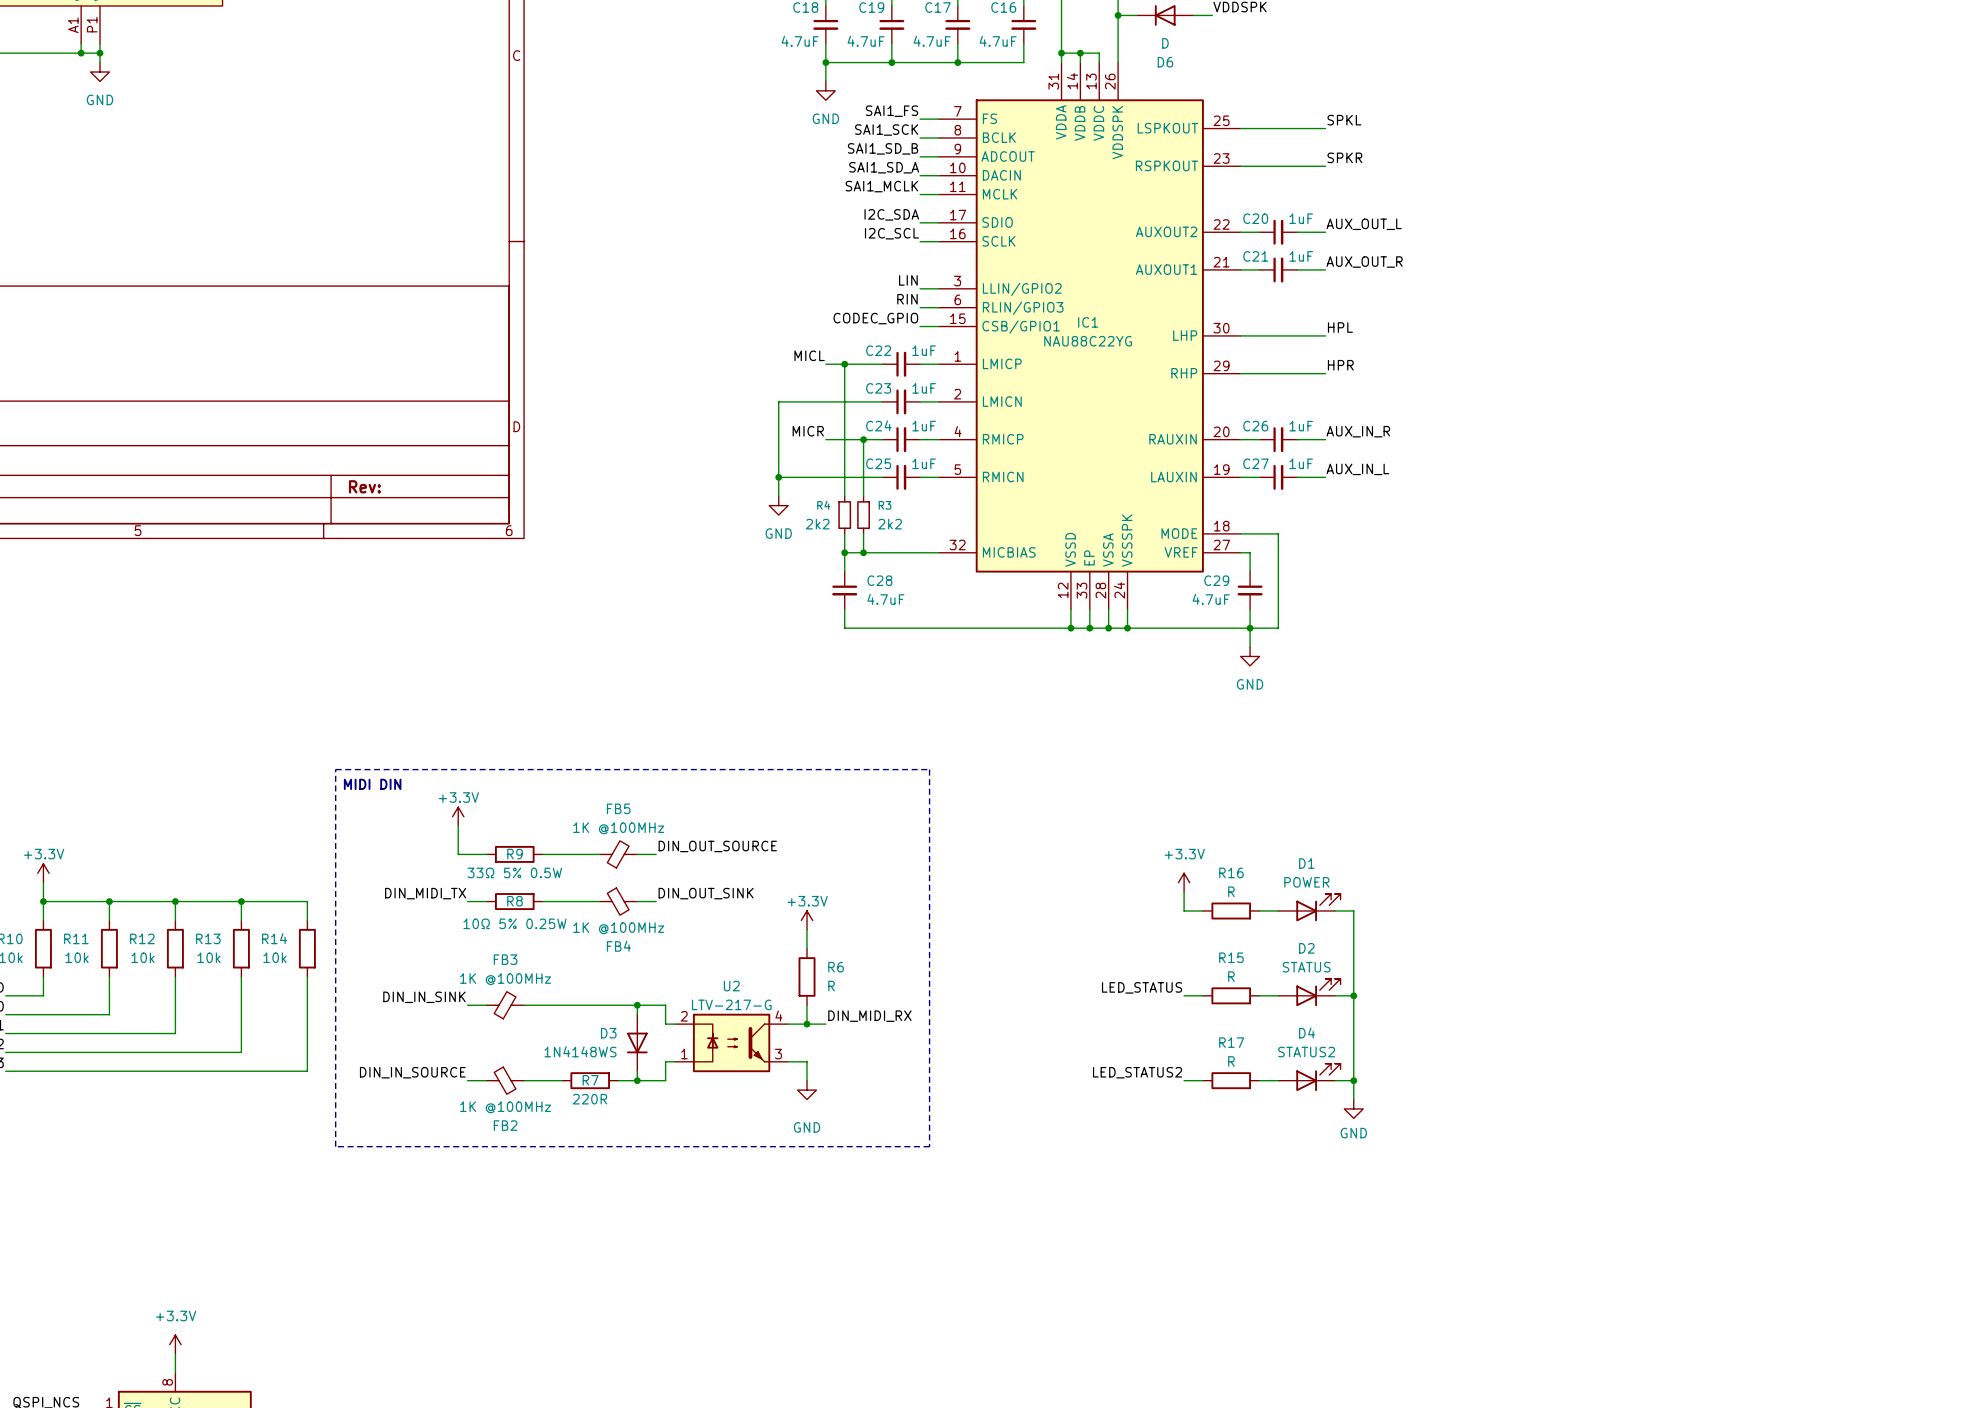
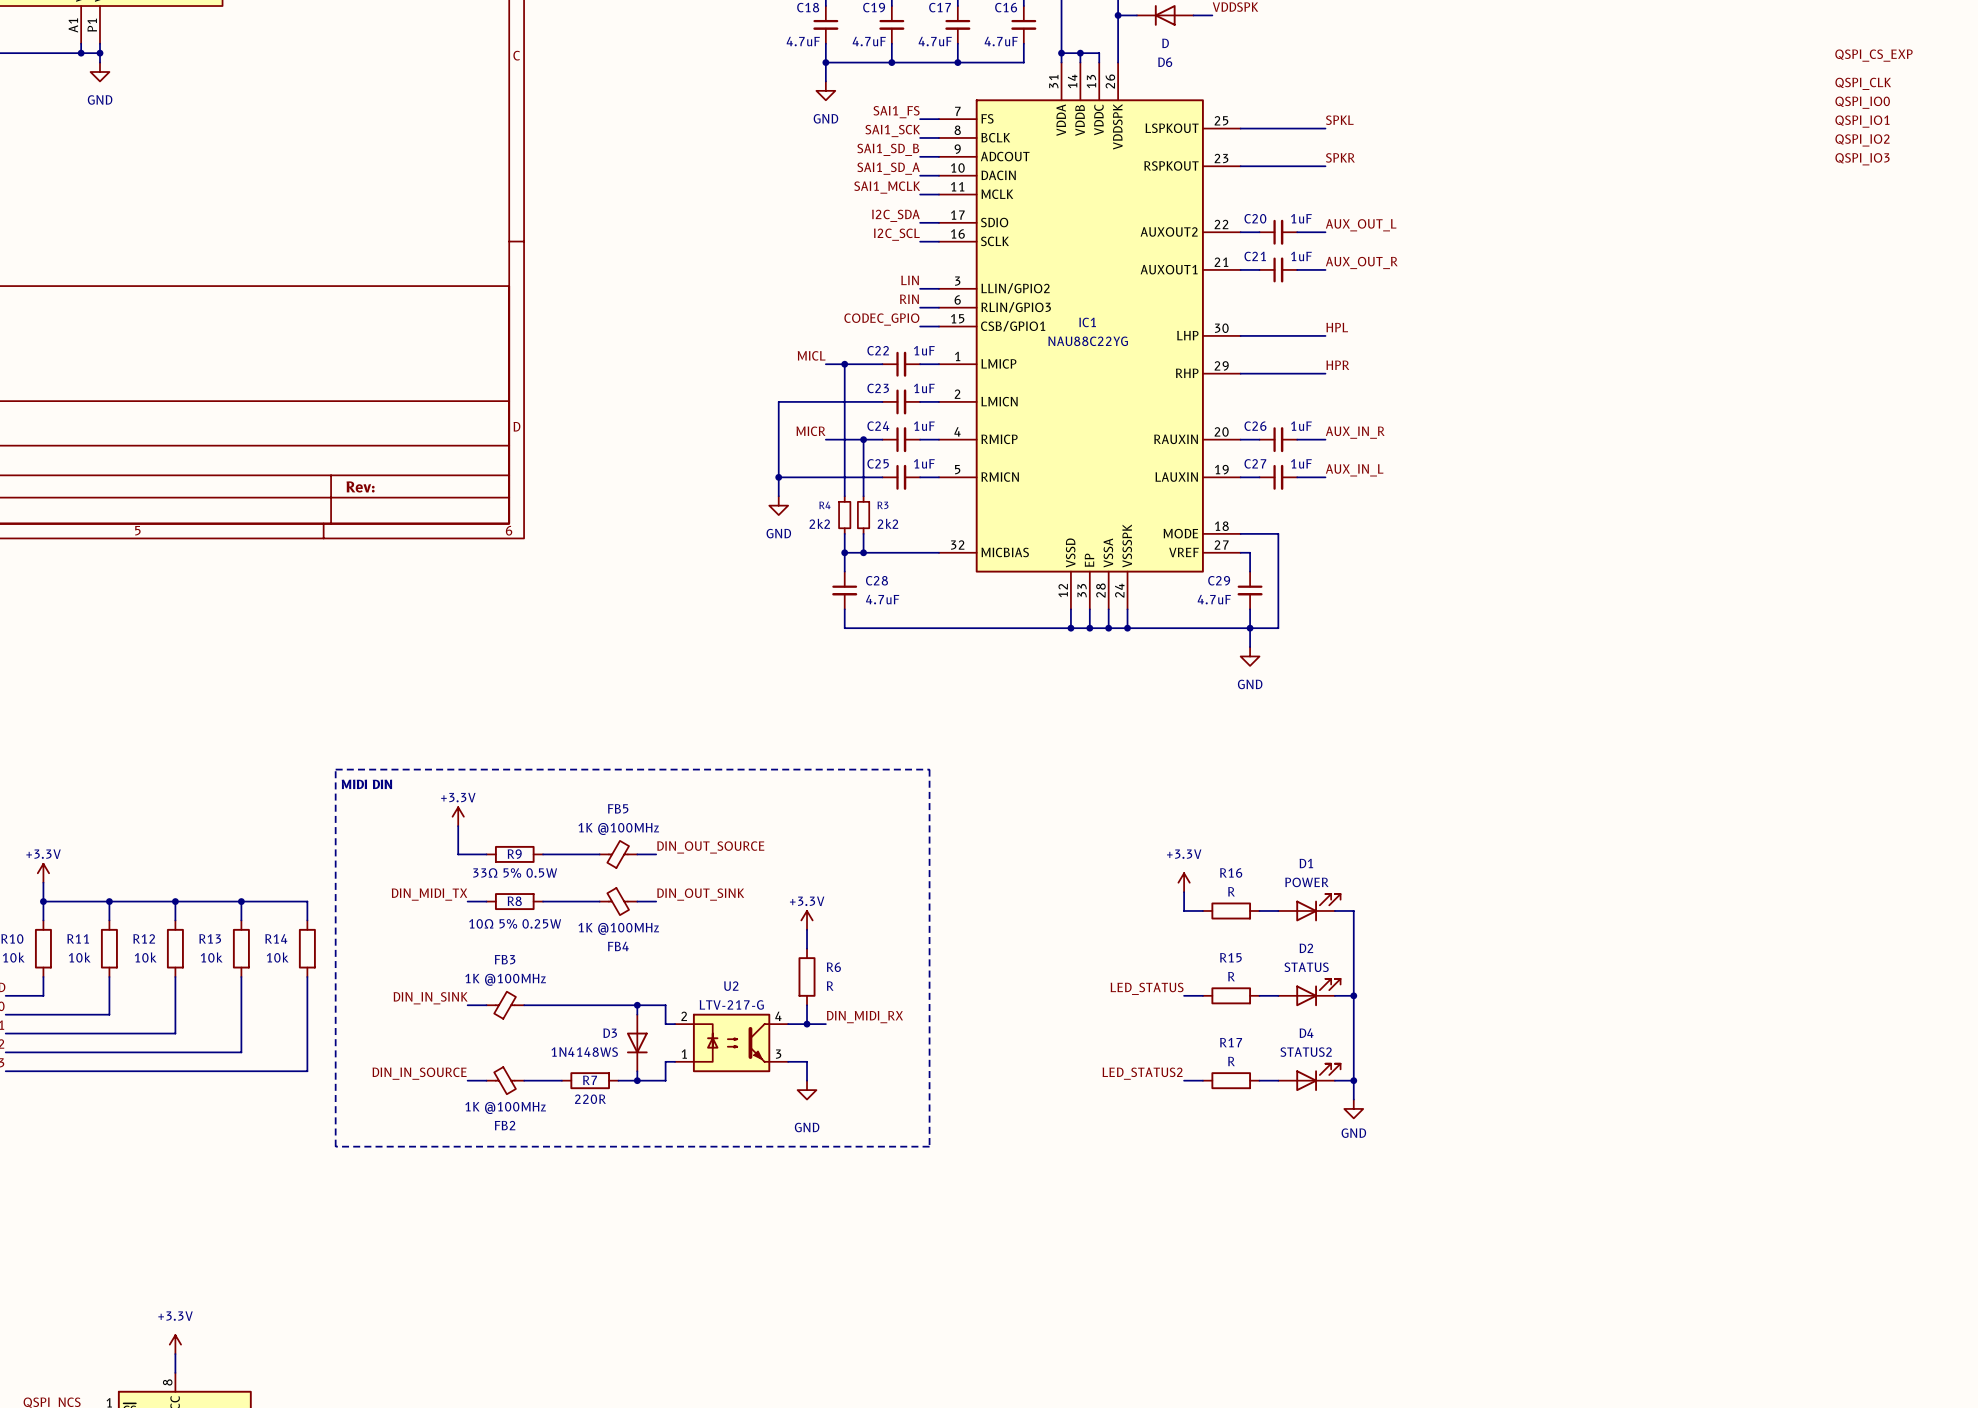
label: none -> QSPI_CS_EXP (1873, 55)
label: none -> QSPI_CLK (1863, 83)
label: none -> QSPI_IO0 (1862, 102)
label: none -> QSPI_IO1 (1862, 121)
label: none -> QSPI_IO2 (1862, 140)
label: none -> QSPI_IO3 (1862, 159)

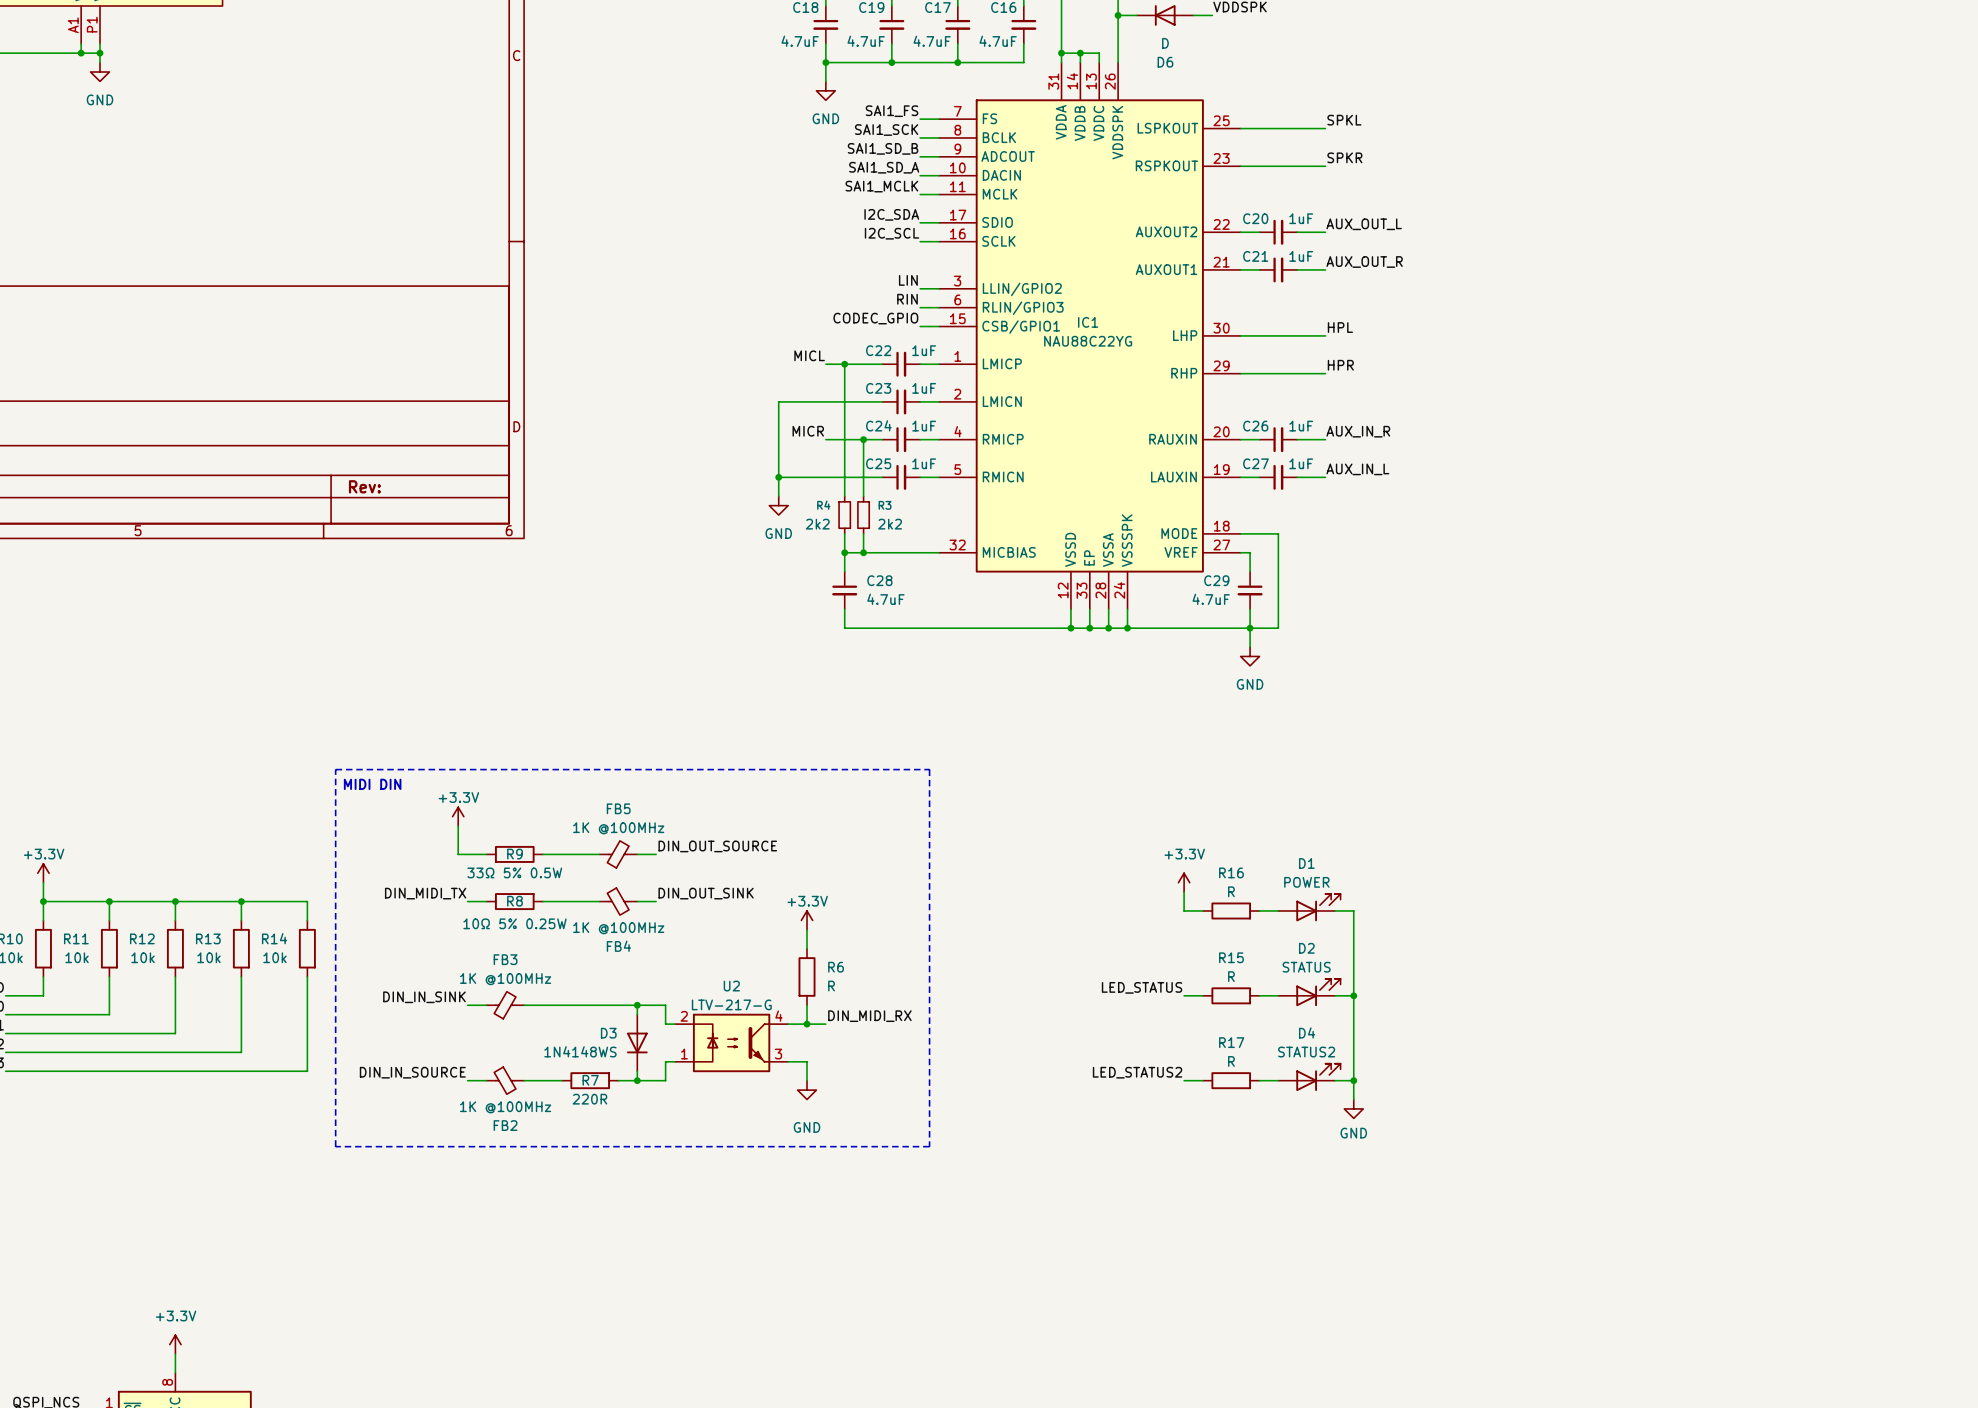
label: QSPI_CS_EXP (1873, 55) -> none
label: QSPI_CLK (1863, 83) -> none
label: QSPI_IO0 (1862, 102) -> none
label: QSPI_IO1 (1862, 121) -> none
label: QSPI_IO2 (1862, 140) -> none
label: QSPI_IO3 (1862, 159) -> none

